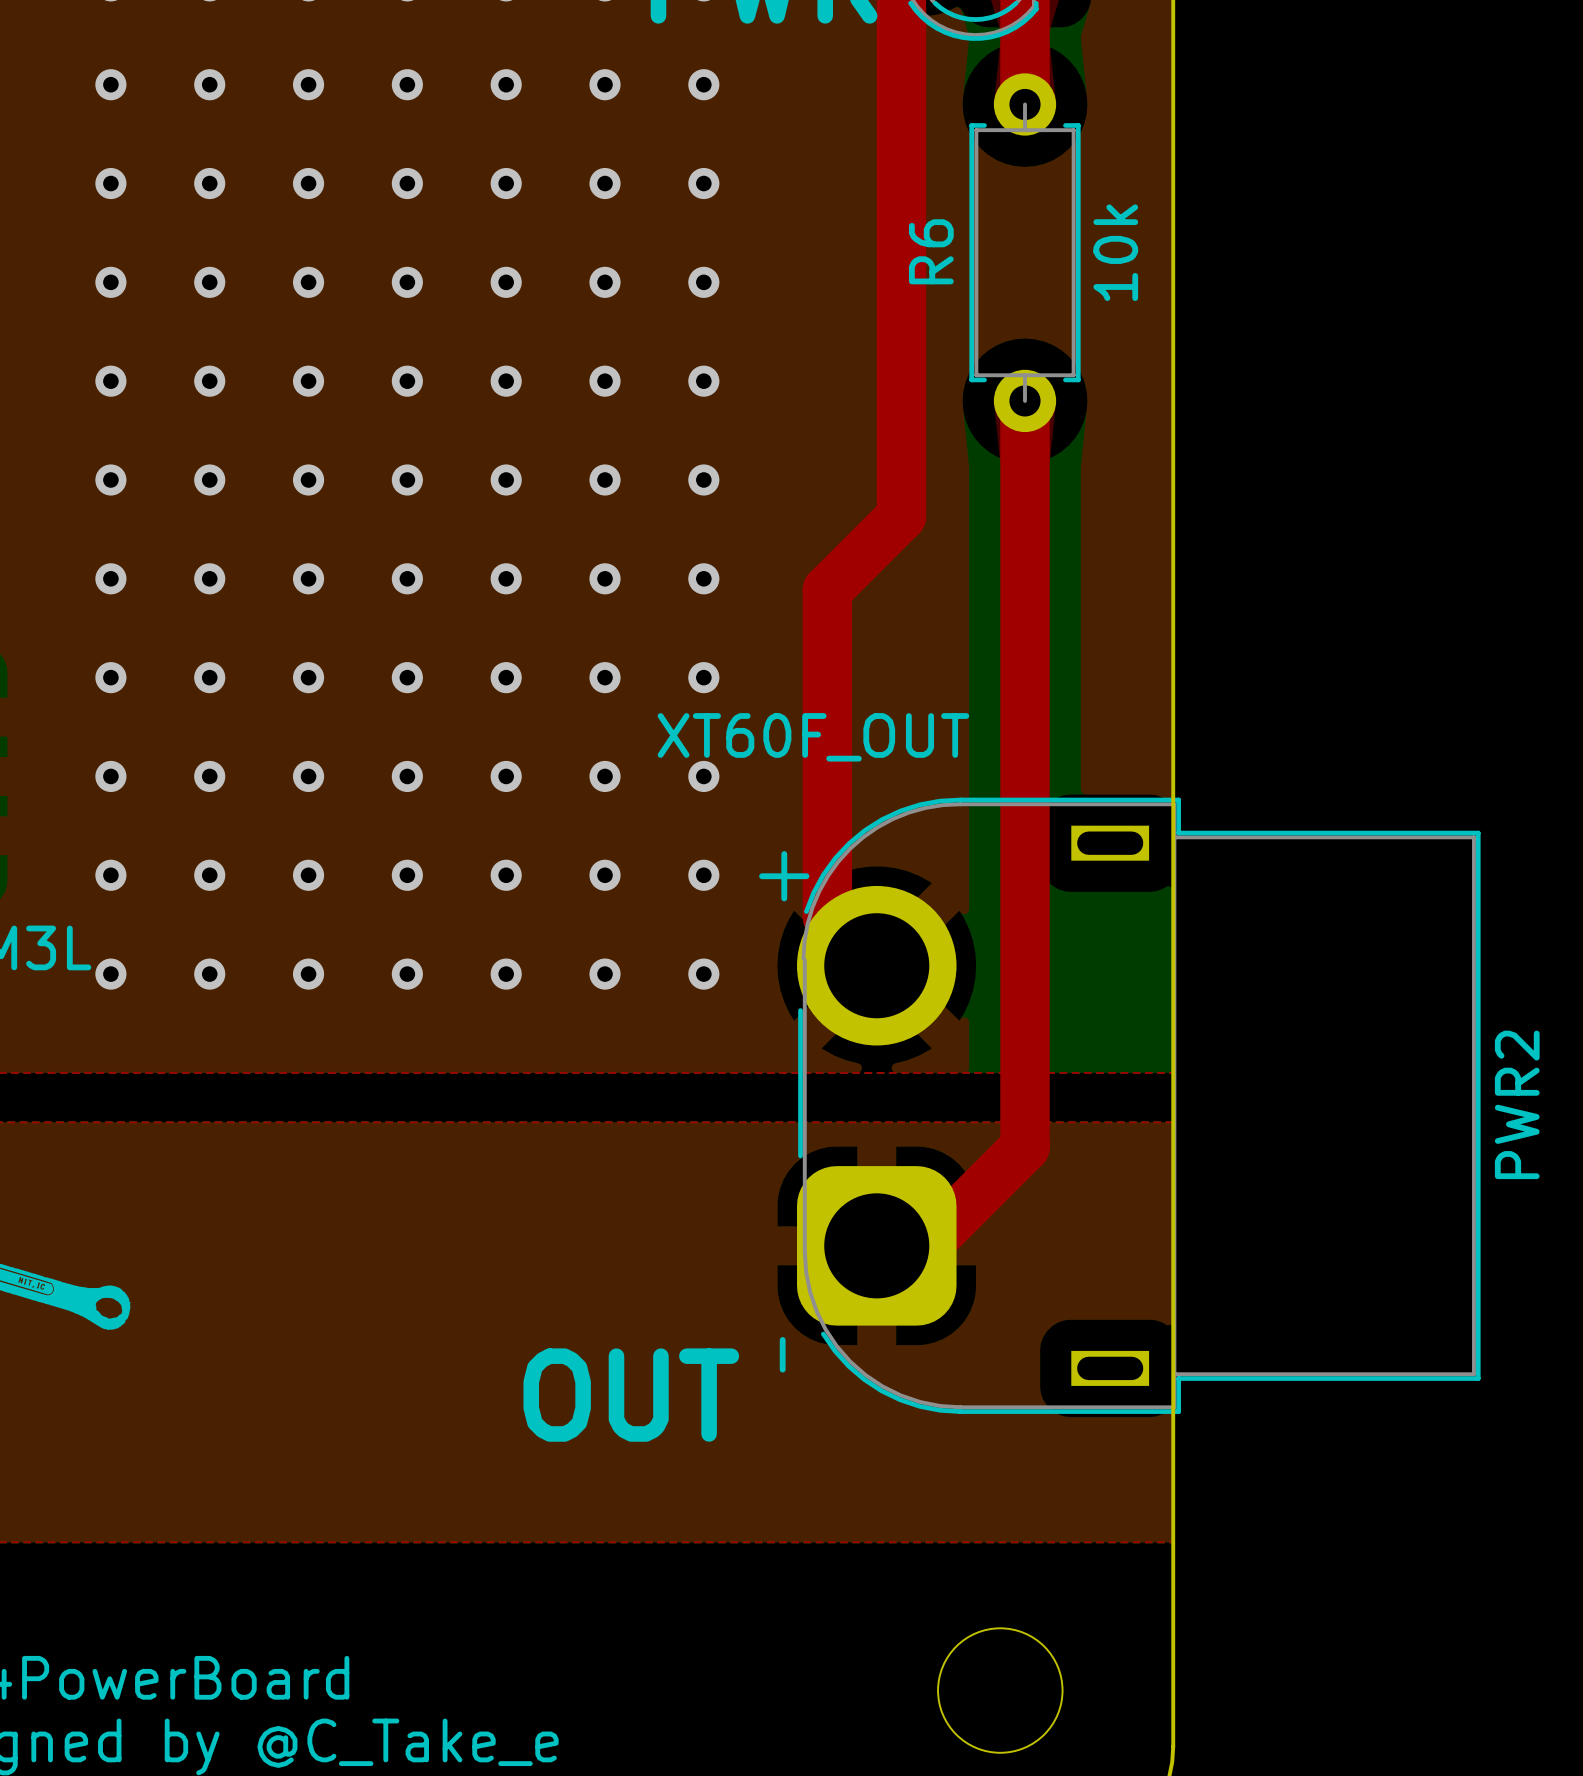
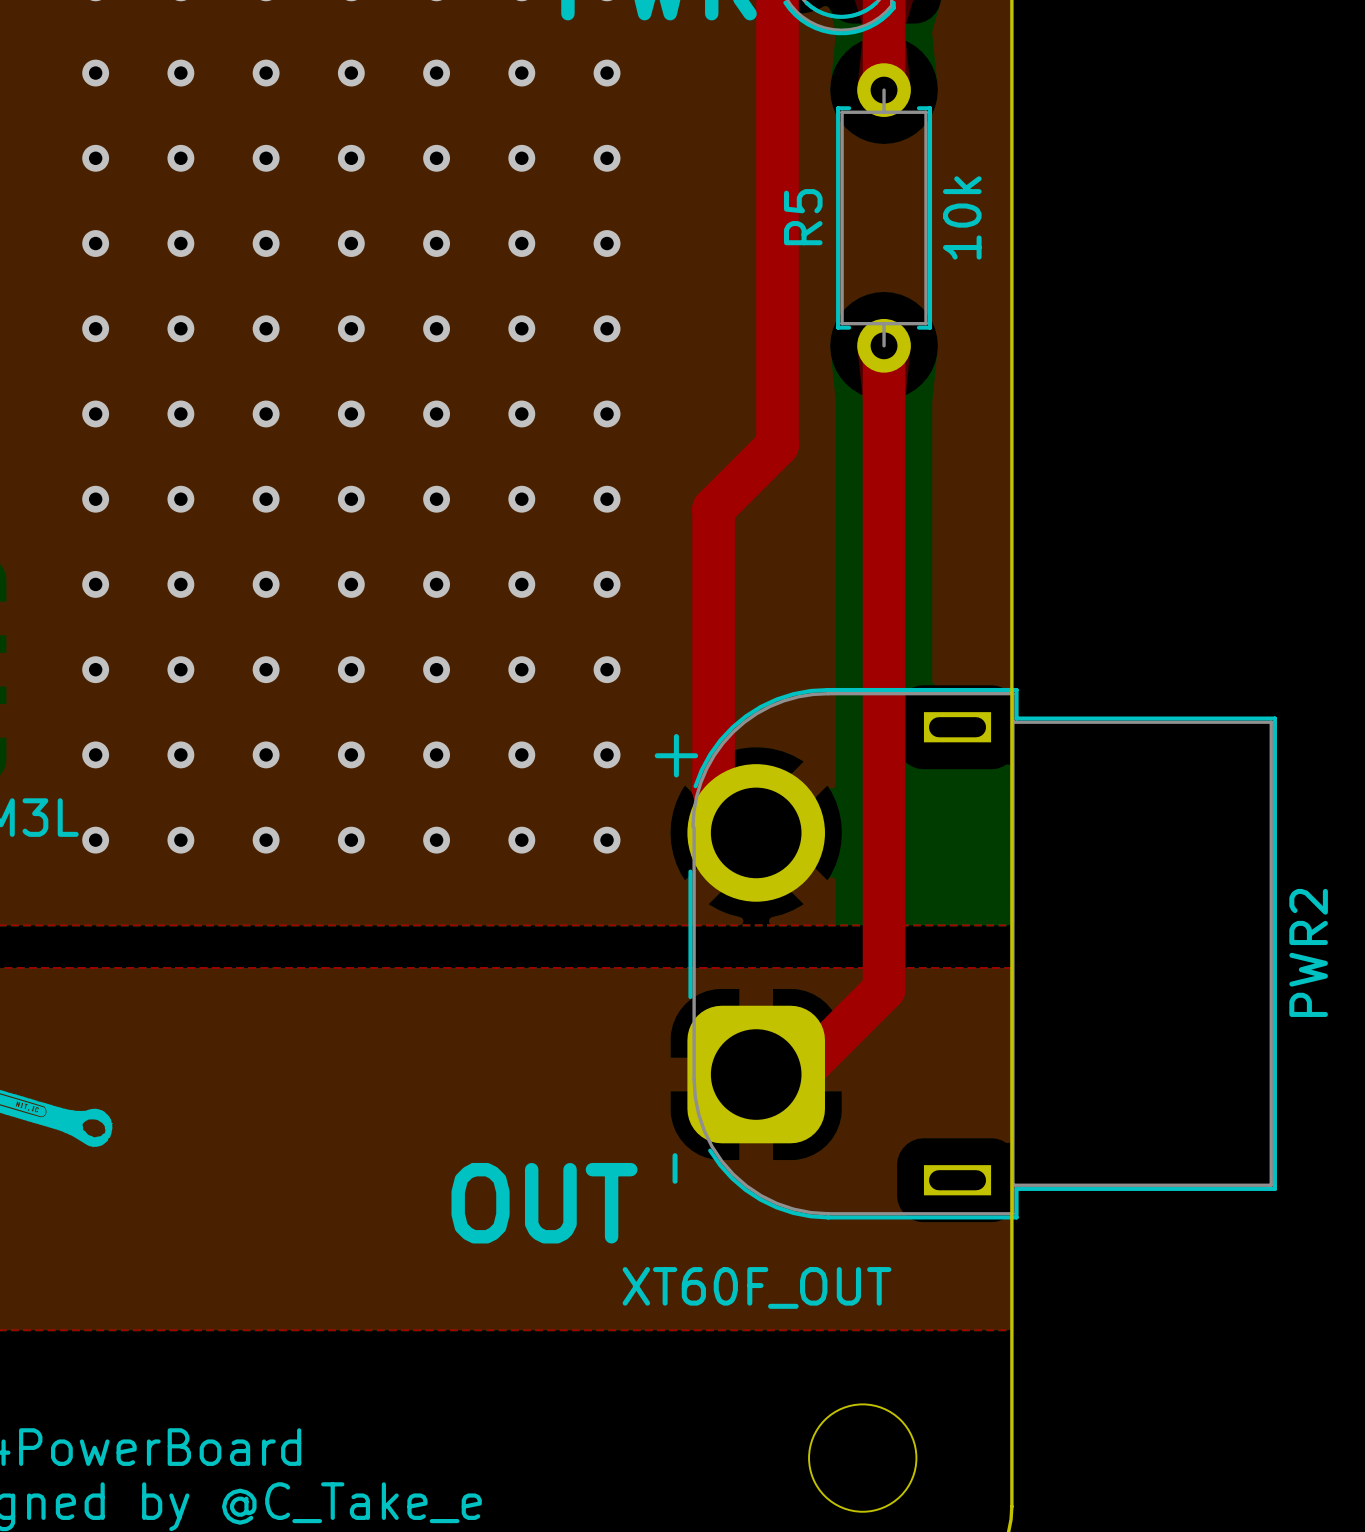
R6 name: R6 (931, 251) -> R5 (803, 217)
PWR2 value position: XT60F_OUT (813, 737) -> XT60F_OUT (756, 1287)

